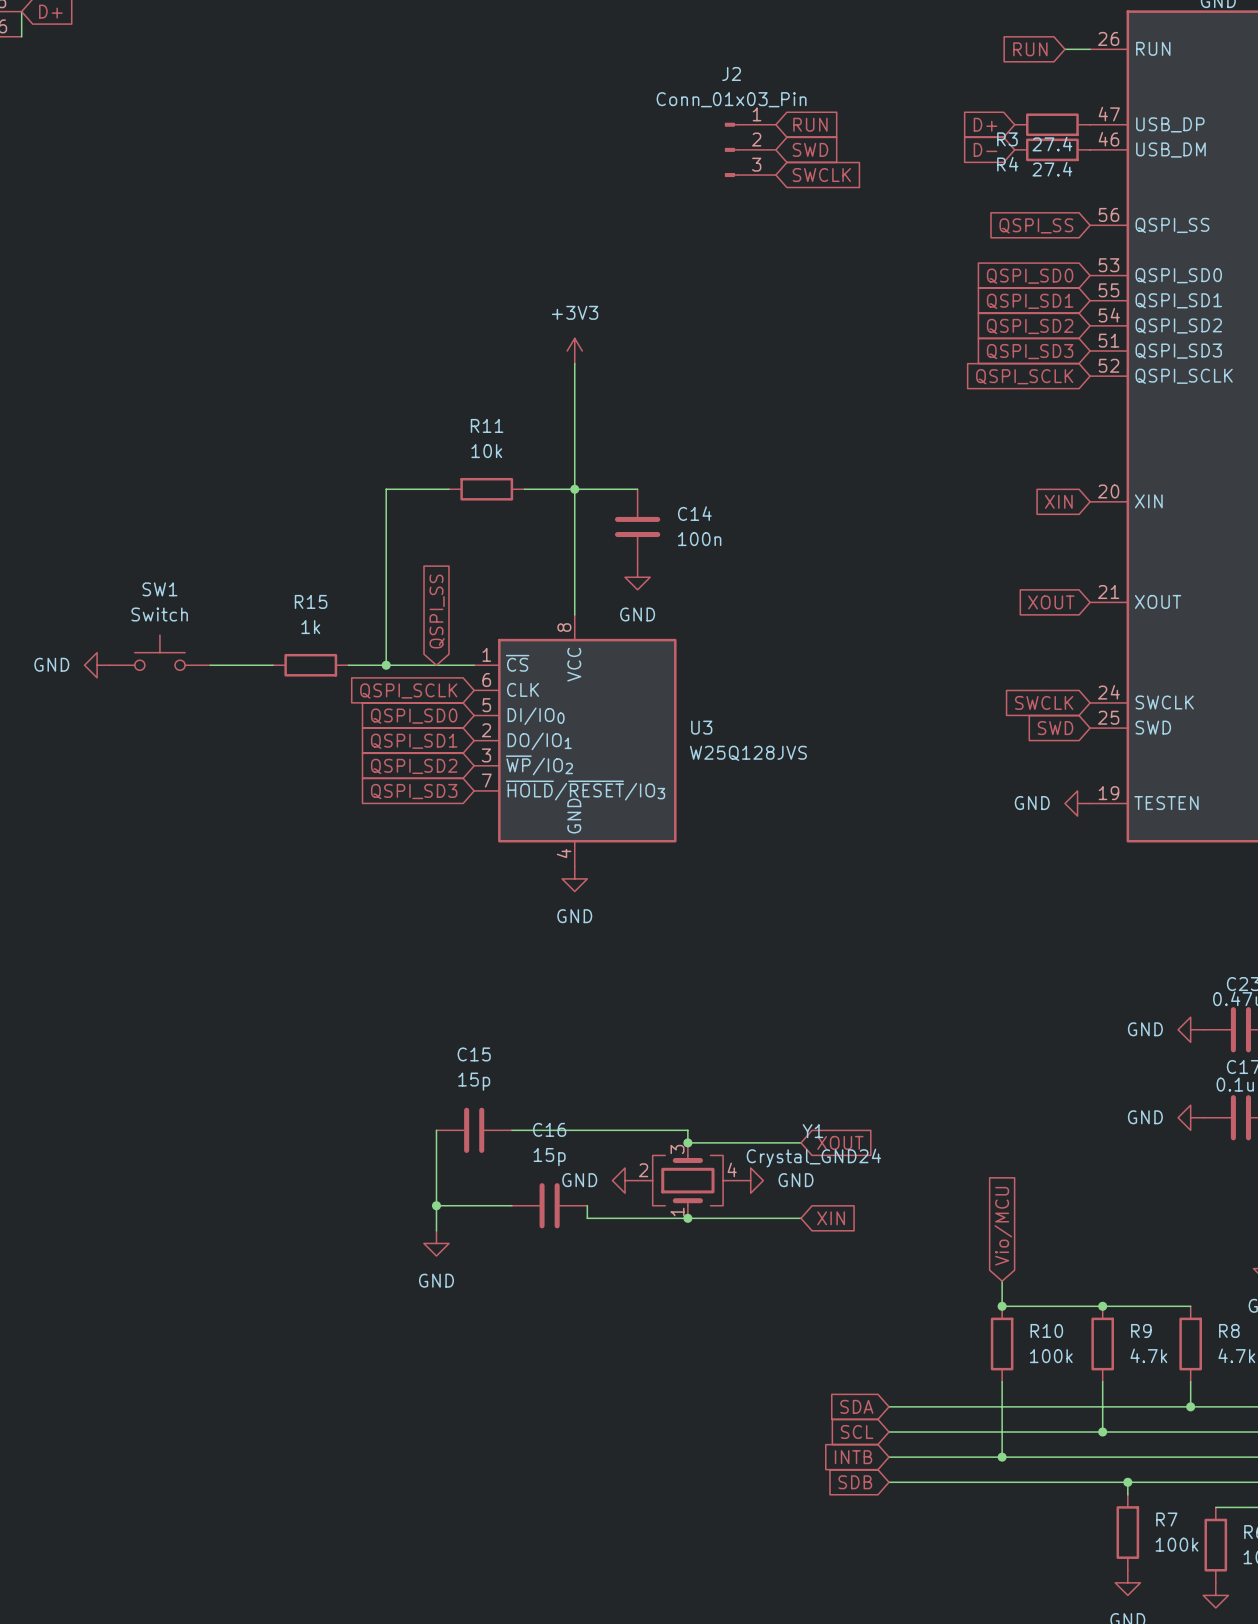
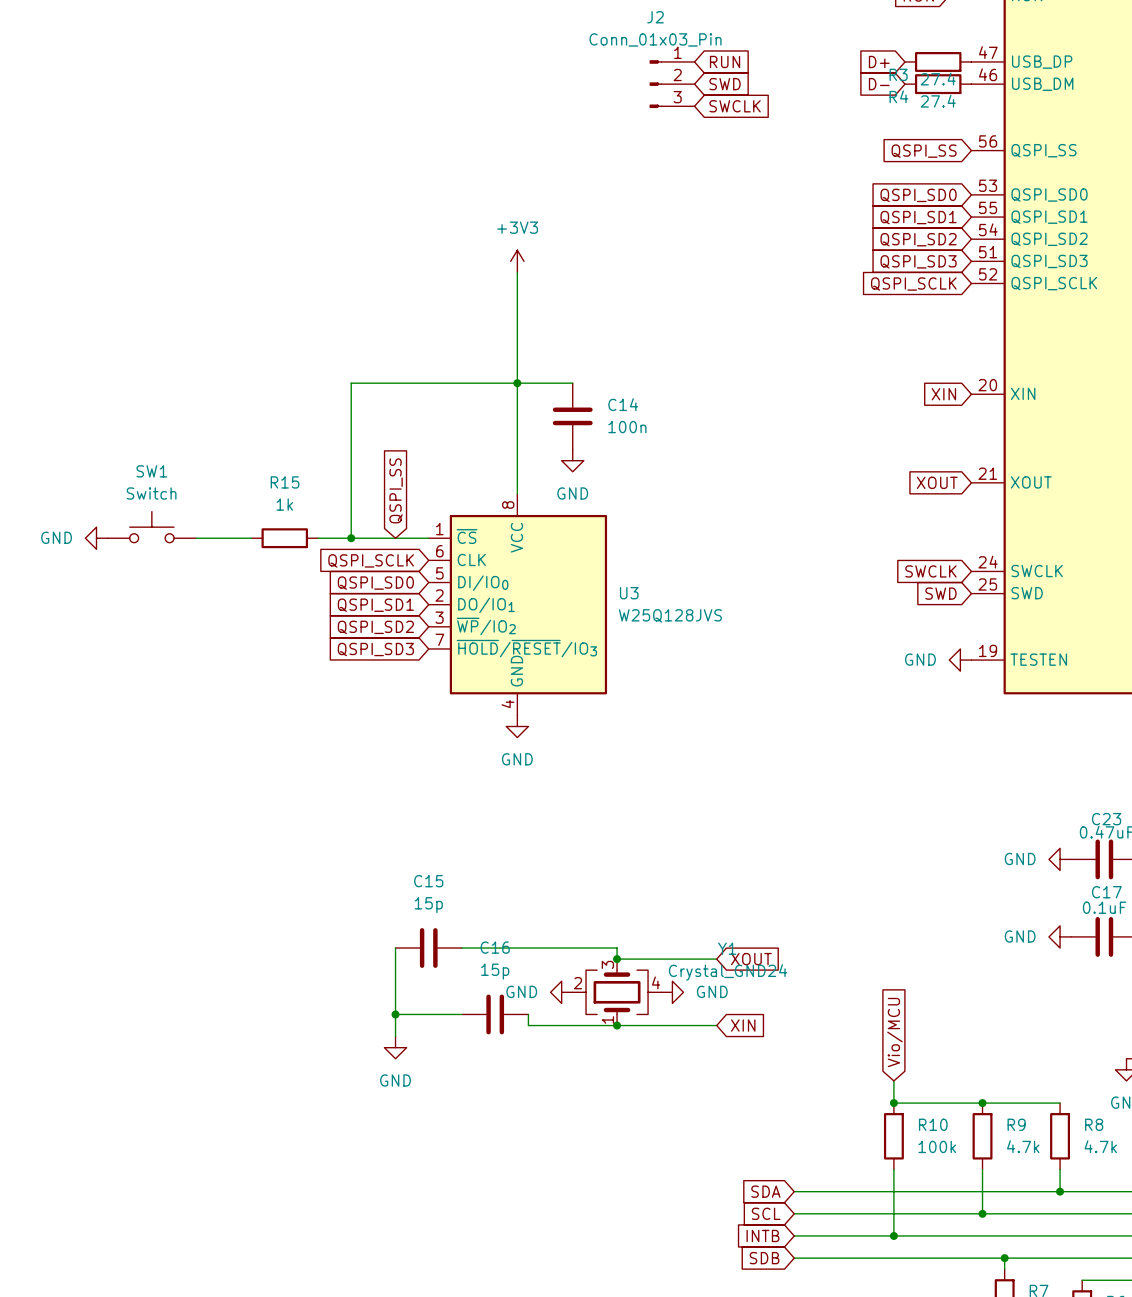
wire: none -> (406, 383) (473, 383)
R11: 10k (486, 489) -> none

